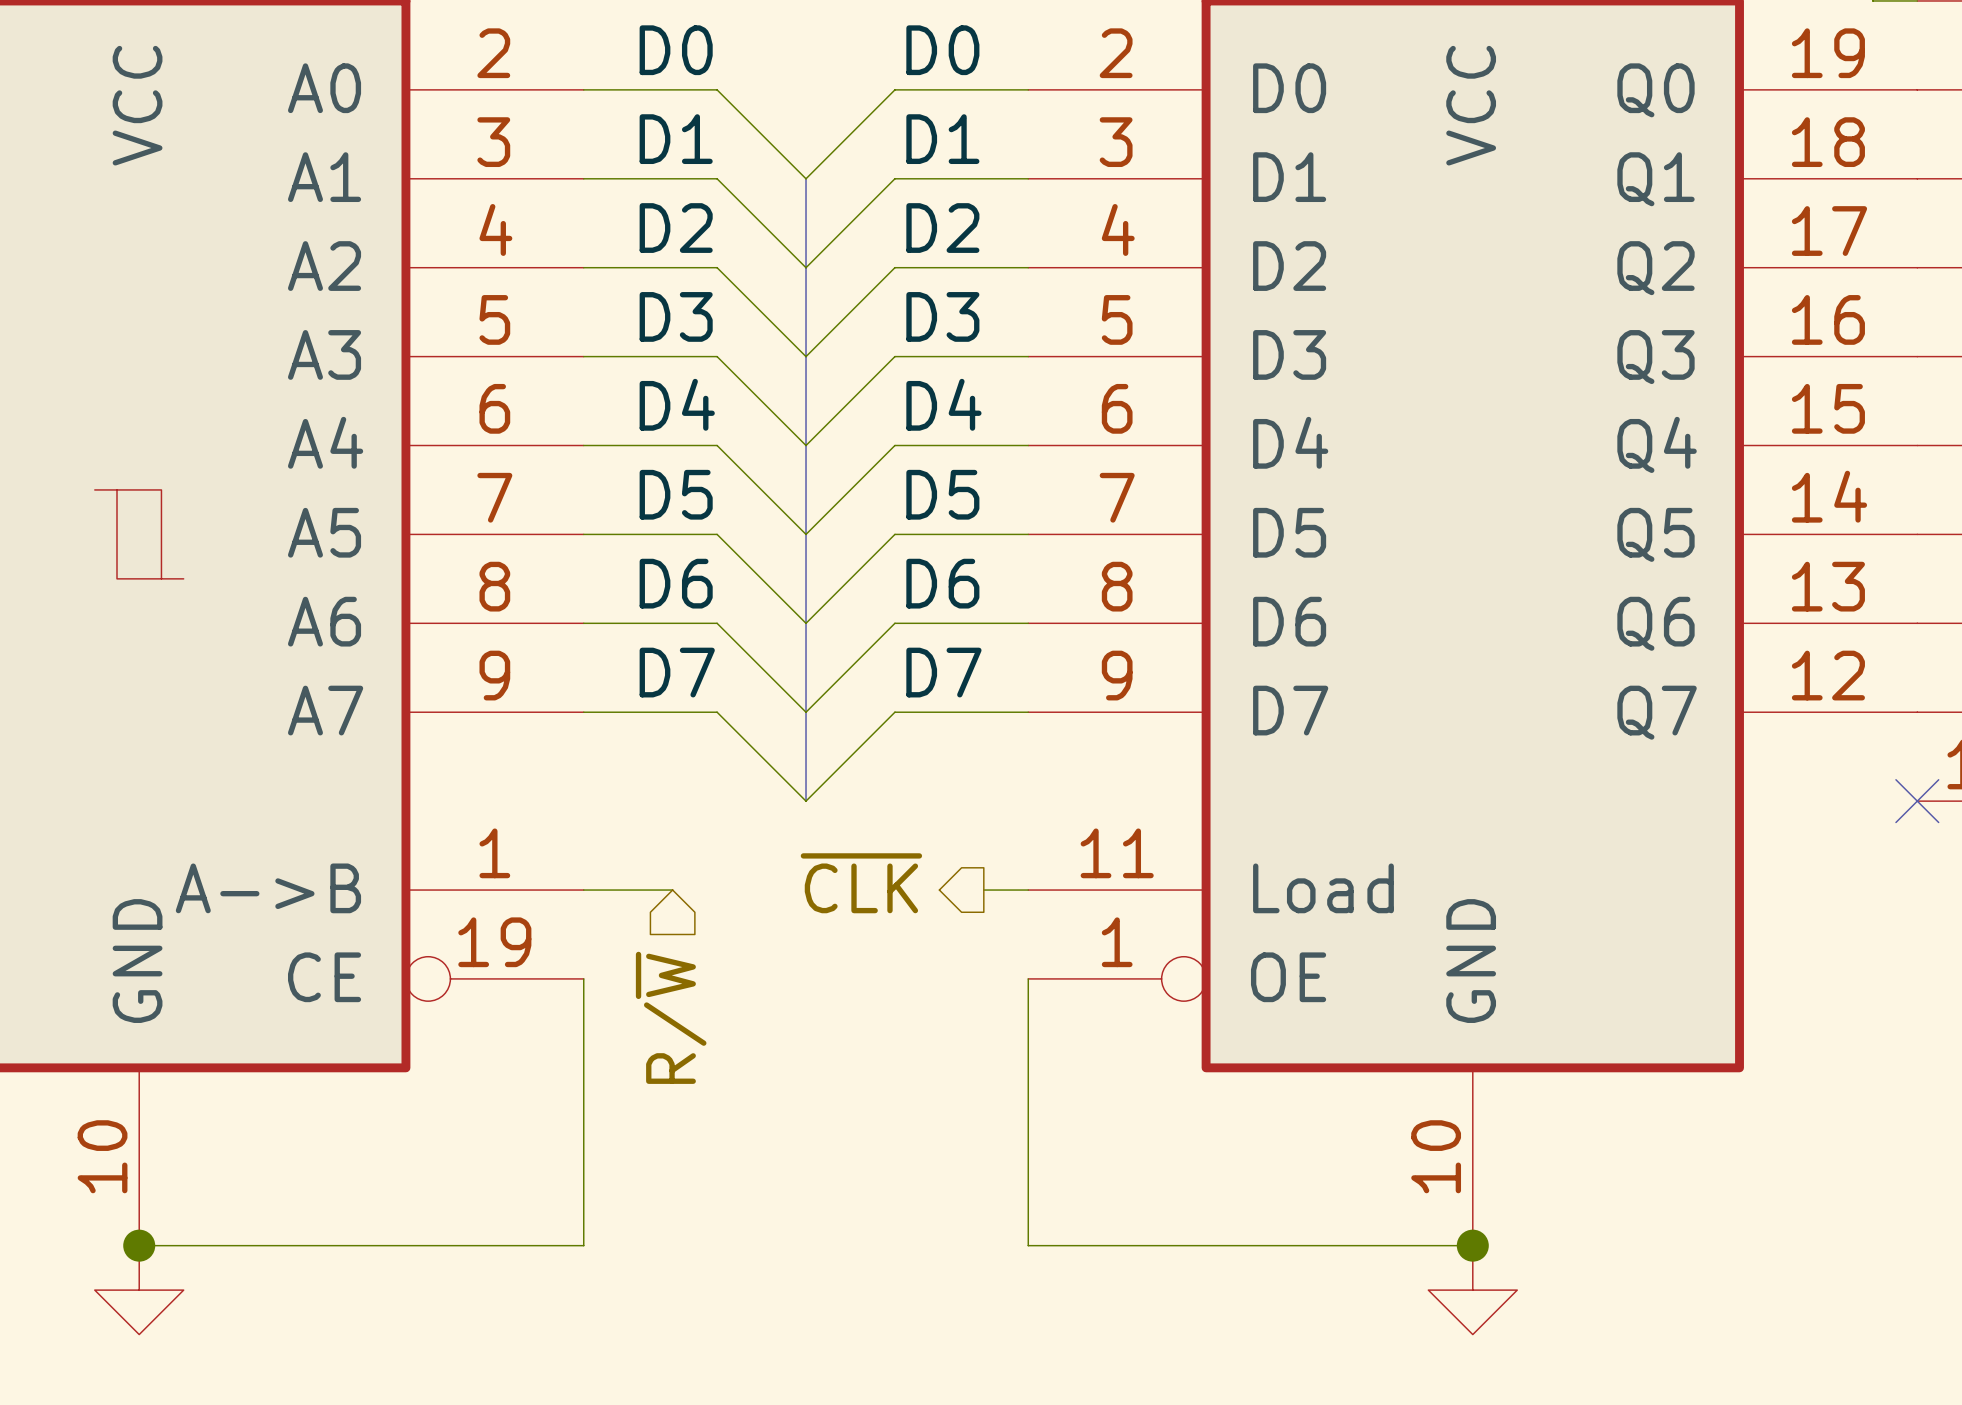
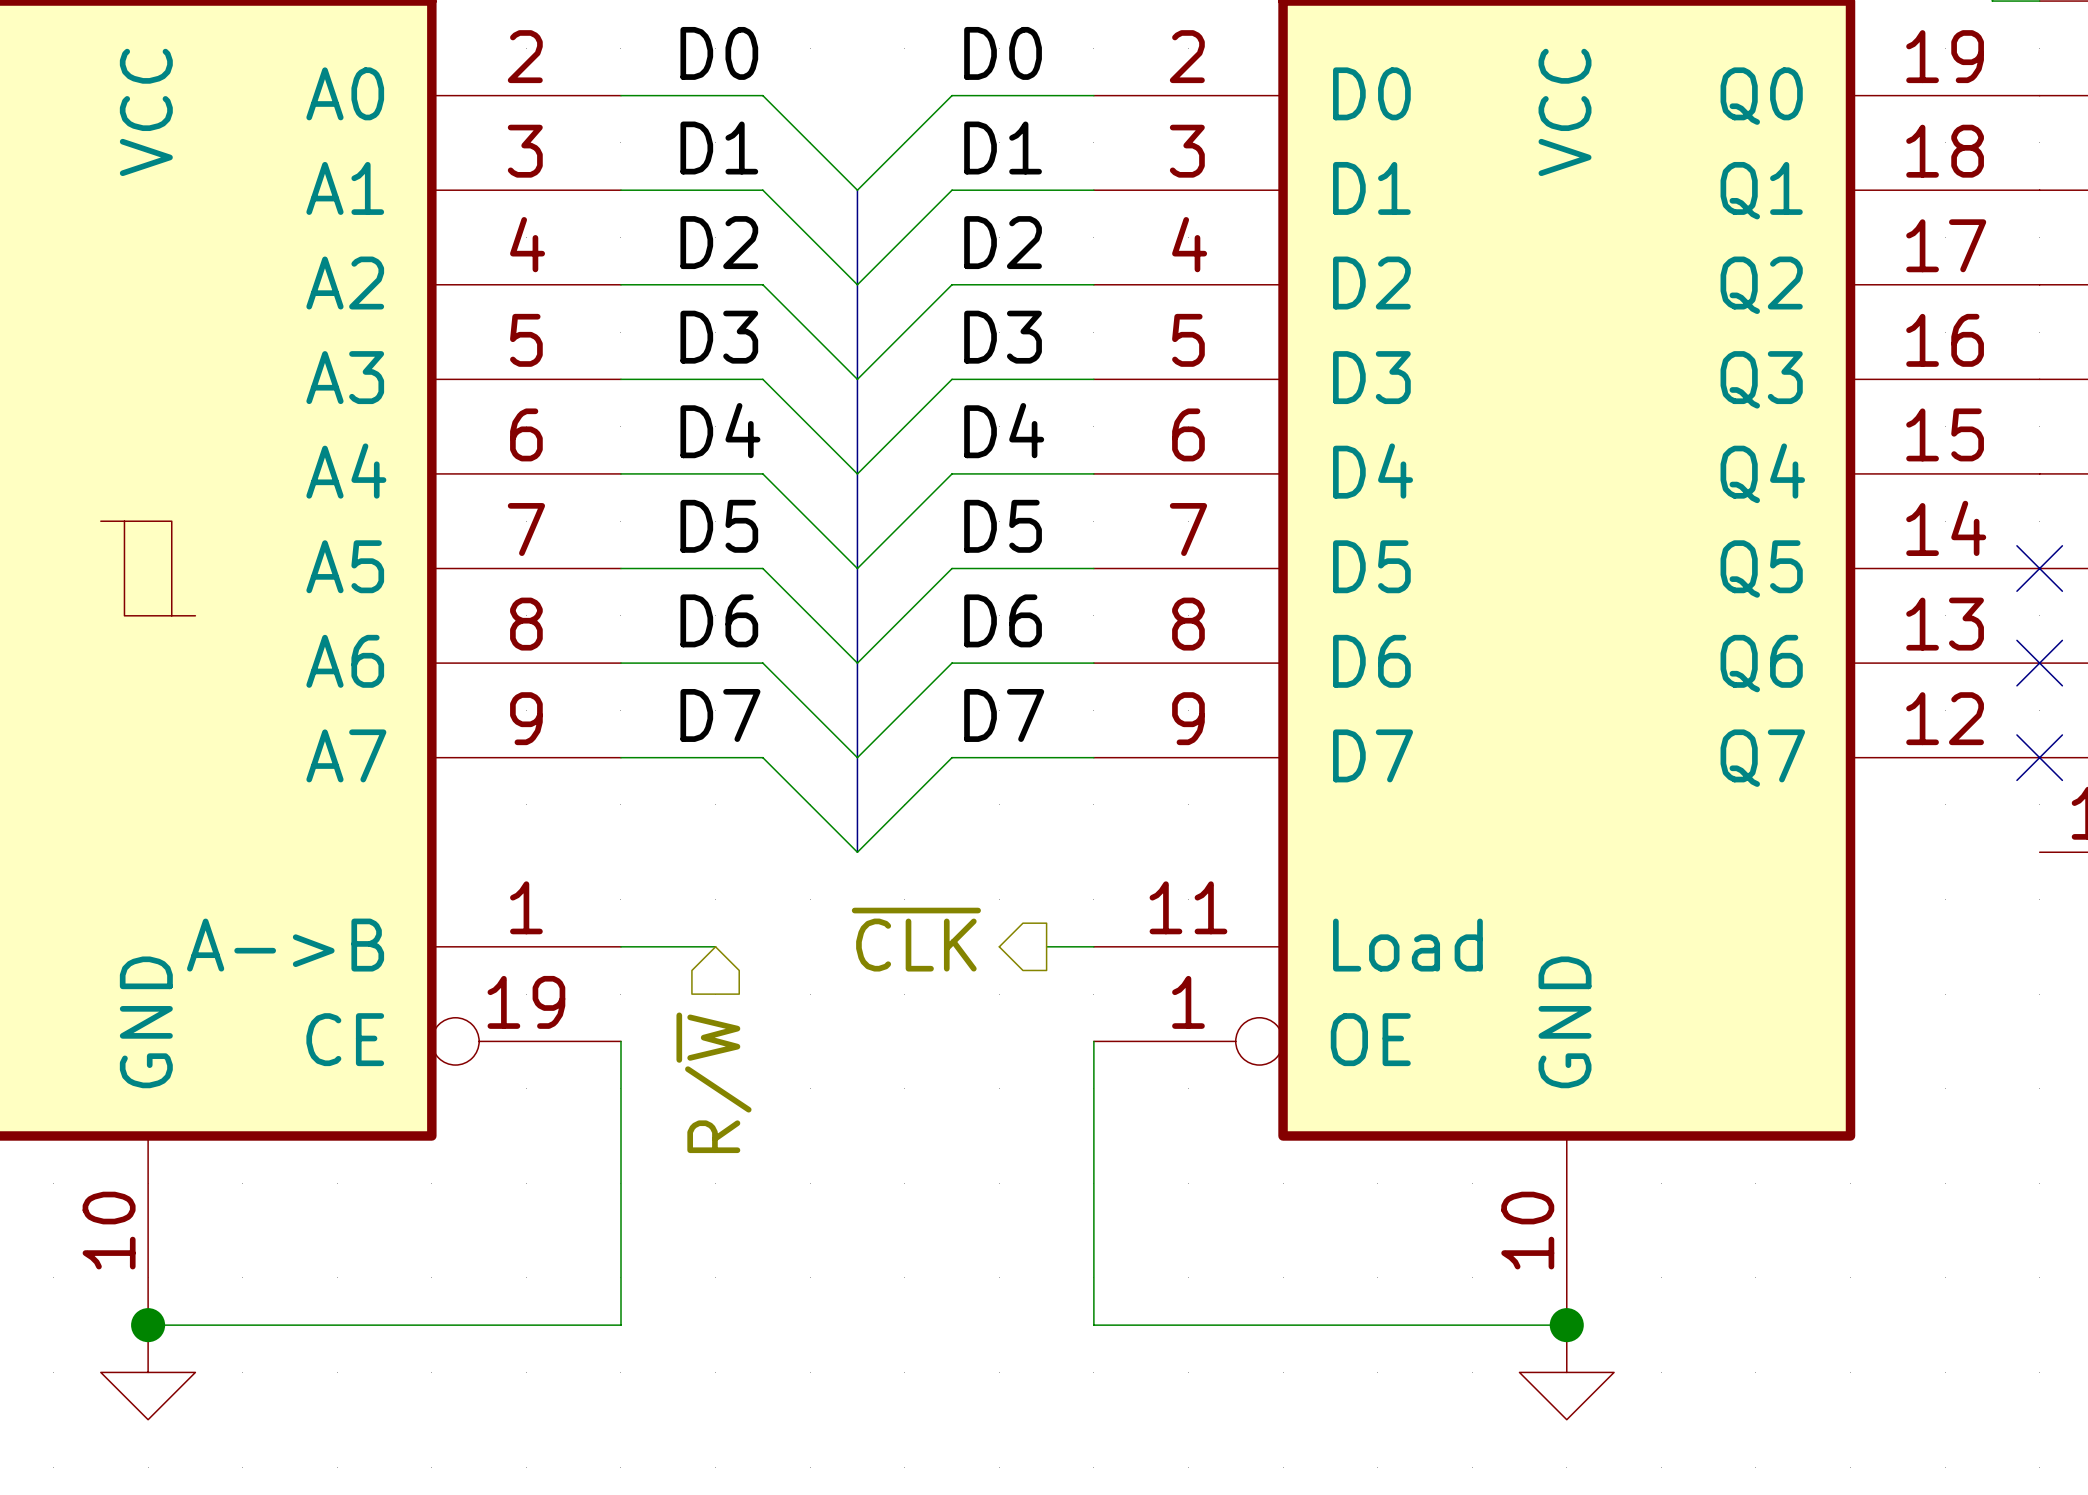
no-connect mark: none -> (2039, 568)
no-connect mark: none -> (2039, 663)
no-connect mark: none -> (2039, 757)
no-connect mark: (1917, 801) -> none

